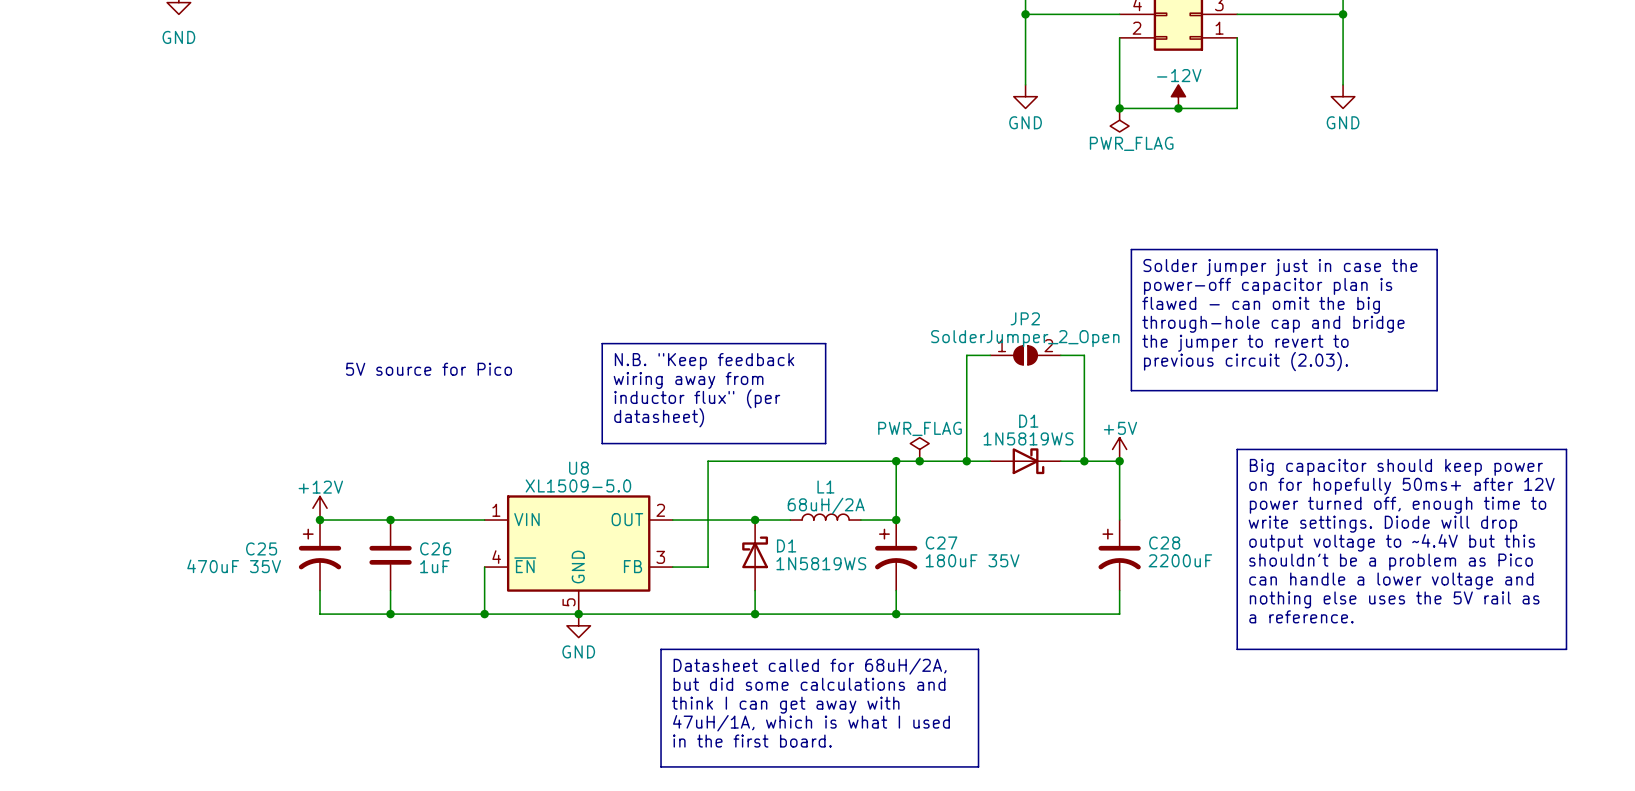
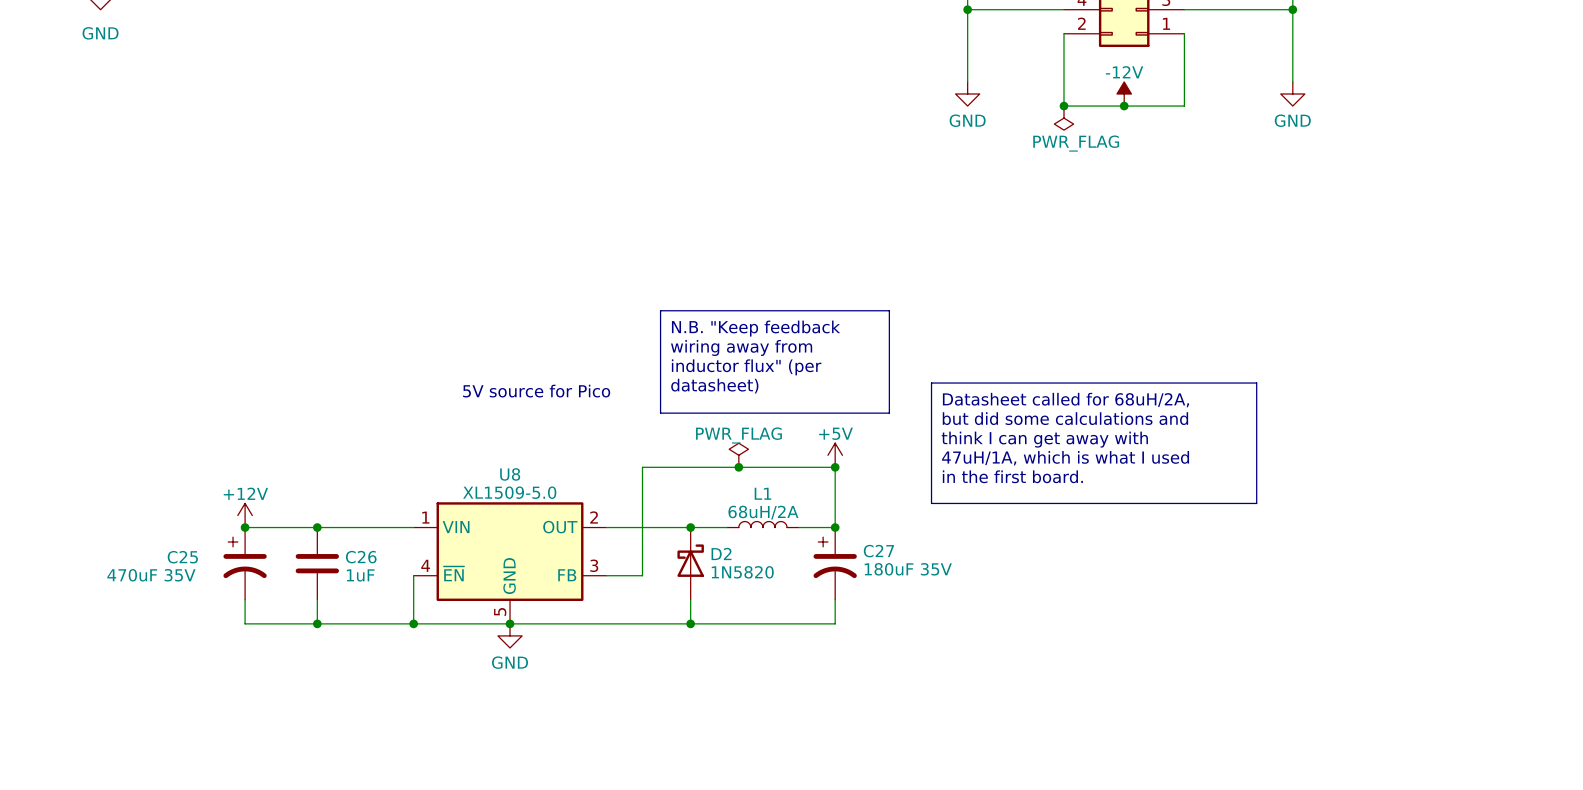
line: (1131, 249) (1437, 249) (1437, 390) (1131, 390) (1131, 249) -> none
text: Solder jumper just in case the (1280, 267) -> none
text: power-off capacitor plan is (1268, 286) -> none
text: flawed - can omit the big (1261, 305) -> none
text: through-hole cap and bridge (1273, 324) -> none
line: (602, 343) (825, 343) (825, 443) (602, 443) (602, 343) -> (660, 310) (889, 310) (889, 413) (660, 413) (660, 310)
text: the jumper to revert to (1245, 343) -> none
wire: (990, 355) (966, 355) (966, 461) -> none
JP2: SolderJumper_2_Open (1025, 355) -> none
wire: (1060, 355) (1084, 355) (1084, 461) -> none
text position: N.B. "Keep feedback (704, 361) -> N.B. "Keep feedback (756, 328)
text: previous circuit (2.03). (1245, 361) -> none
text position: 5V source for Pico (429, 369) -> 5V source for Pico (536, 391)
line: none -> (931, 383) (1256, 383) (1256, 503) (931, 503) (931, 383)
text position: wiring away from (688, 380) -> wiring away from (741, 347)
text: none -> Datasheet called for 68uH/2A, (1065, 400)
text position: inductor flux" (per (697, 398) -> inductor flux" (per (746, 367)
text: none -> but did some calculations and (1065, 418)
text position: datasheet) (659, 417) -> datasheet) (714, 386)
text: none -> think I can get away with (1044, 439)
power symbol position: PWR_FLAG (919, 449) -> PWR_FLAG (738, 455)
power symbol position: +5V (1119, 449) -> +5V (835, 455)
line: (1237, 449) (1566, 449) (1566, 649) (1237, 649) (1237, 449) -> none
text: none -> 47uH/1A, which is what I used (1065, 458)
junction: none -> (738, 467)
wire: (896, 461) (990, 461) -> none
junction: (919, 461) -> none
junction: (966, 461) -> none
D1: 1N5819WS (1025, 461) -> none
wire: (1060, 461) (1119, 461) (1119, 520) -> none
junction: (1084, 461) -> none
junction: (1119, 461) -> none
text: Big capacitor should keep power (1396, 467) -> none
text: none -> in the first board. (1012, 476)
text: on for hopefully 50ms+ after 12V (1401, 486) -> none
text: power turned off, enough time to (1398, 505) -> none
text: write settings. Diode will drop (1382, 524) -> none
text: output voltage to ~4.4V but this (1392, 542) -> none
D1 name: D1 (786, 545) -> D2 (721, 553)
C28: 2200uF (1119, 555) -> none
text: shouldn't be a problem as Pico (1391, 562) -> none
D1 value: 1N5819WS (821, 563) -> 1N5820 (742, 572)
text: can handle a lower voltage and (1391, 580) -> none
wire: (1119, 590) (1119, 614) (896, 614) -> none
text: nothing else uses the 5V rail as (1394, 599) -> none
junction: (896, 614) -> none
text: a reference. (1301, 616) -> none
line: (661, 649) (978, 649) (978, 766) (661, 766) (661, 649) -> none
text: Datasheet called for 68uH/2A, (810, 666) -> none
text: but did some calculations and (809, 684) -> none
text: think I can get away with (785, 705) -> none
text: 47uH/1A, which is what I used (811, 723) -> none
text: in the first board. (752, 741) -> none

